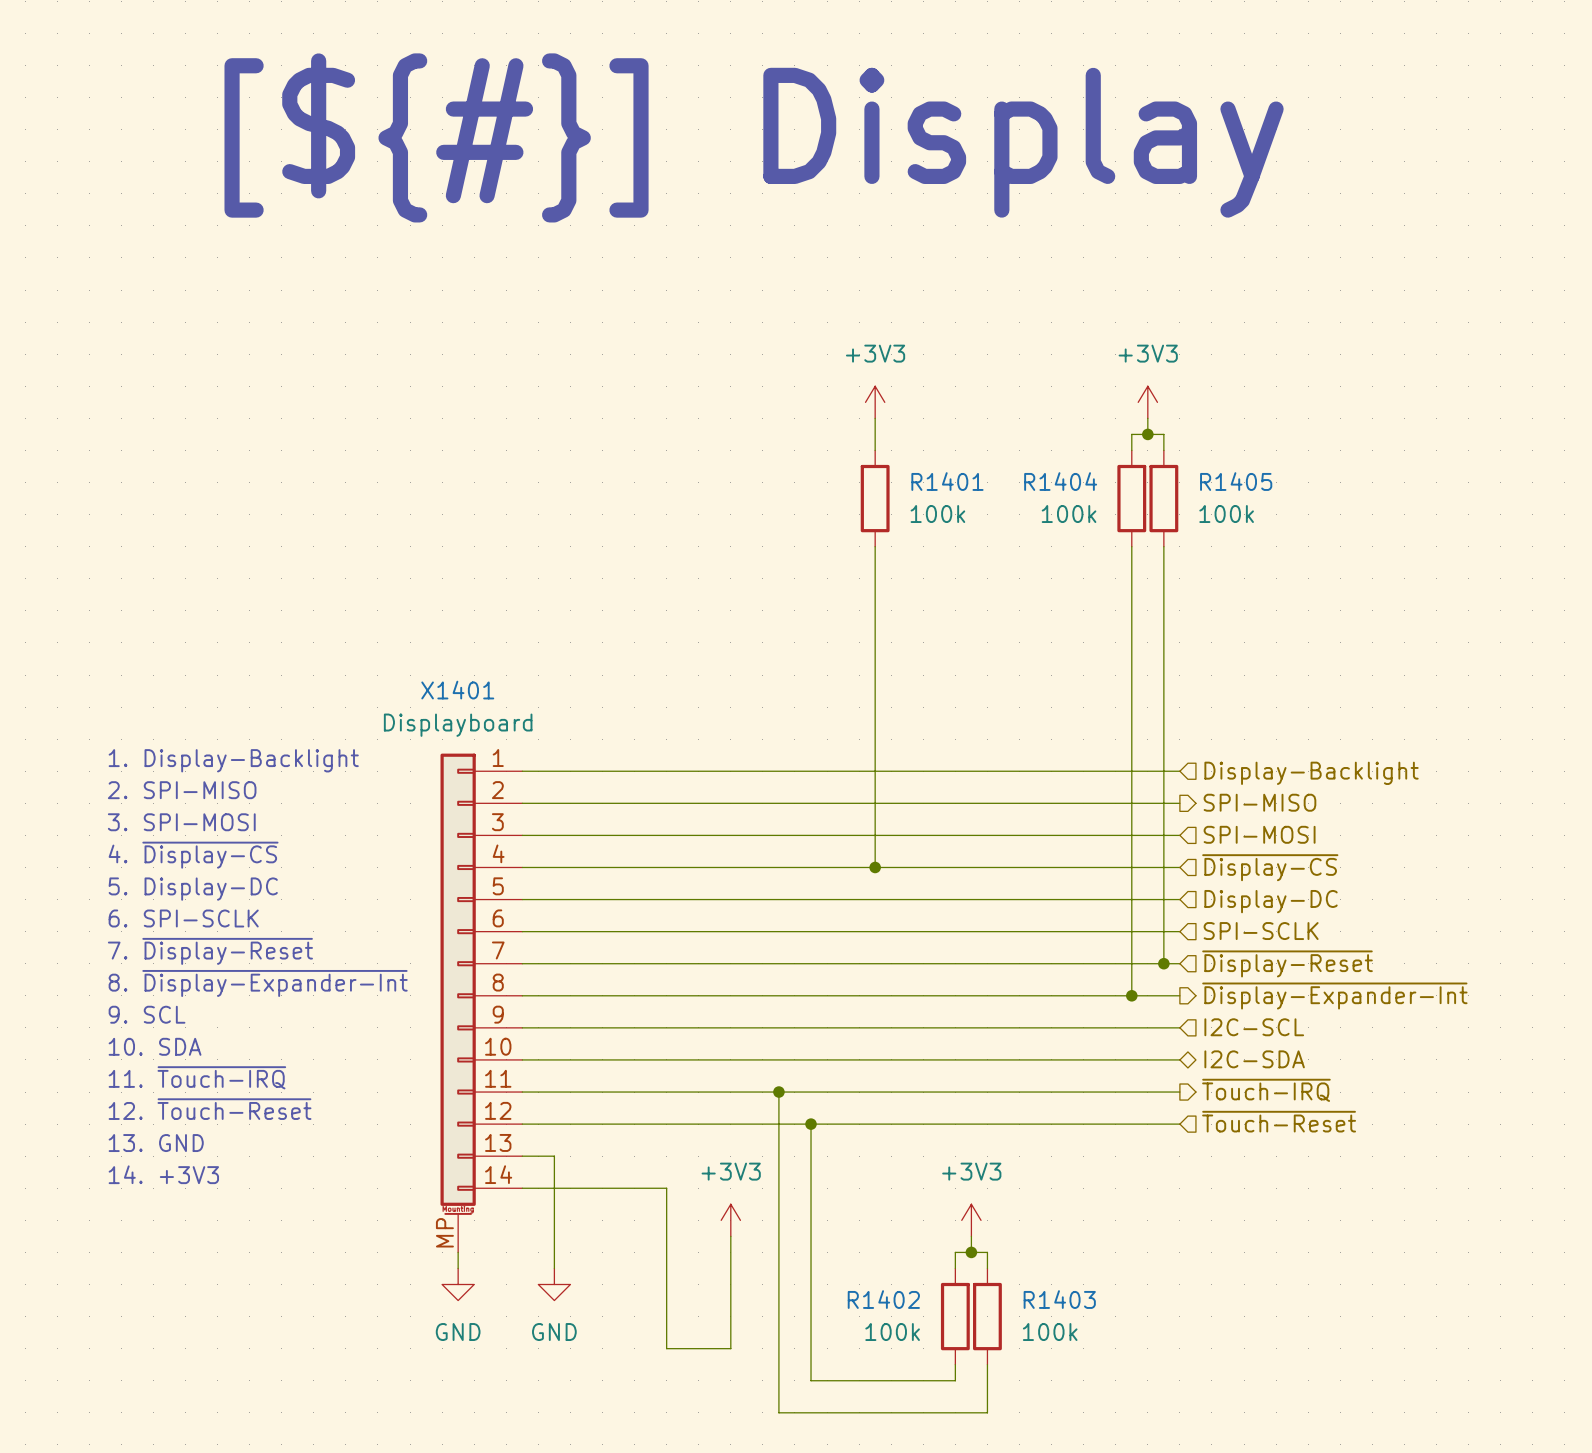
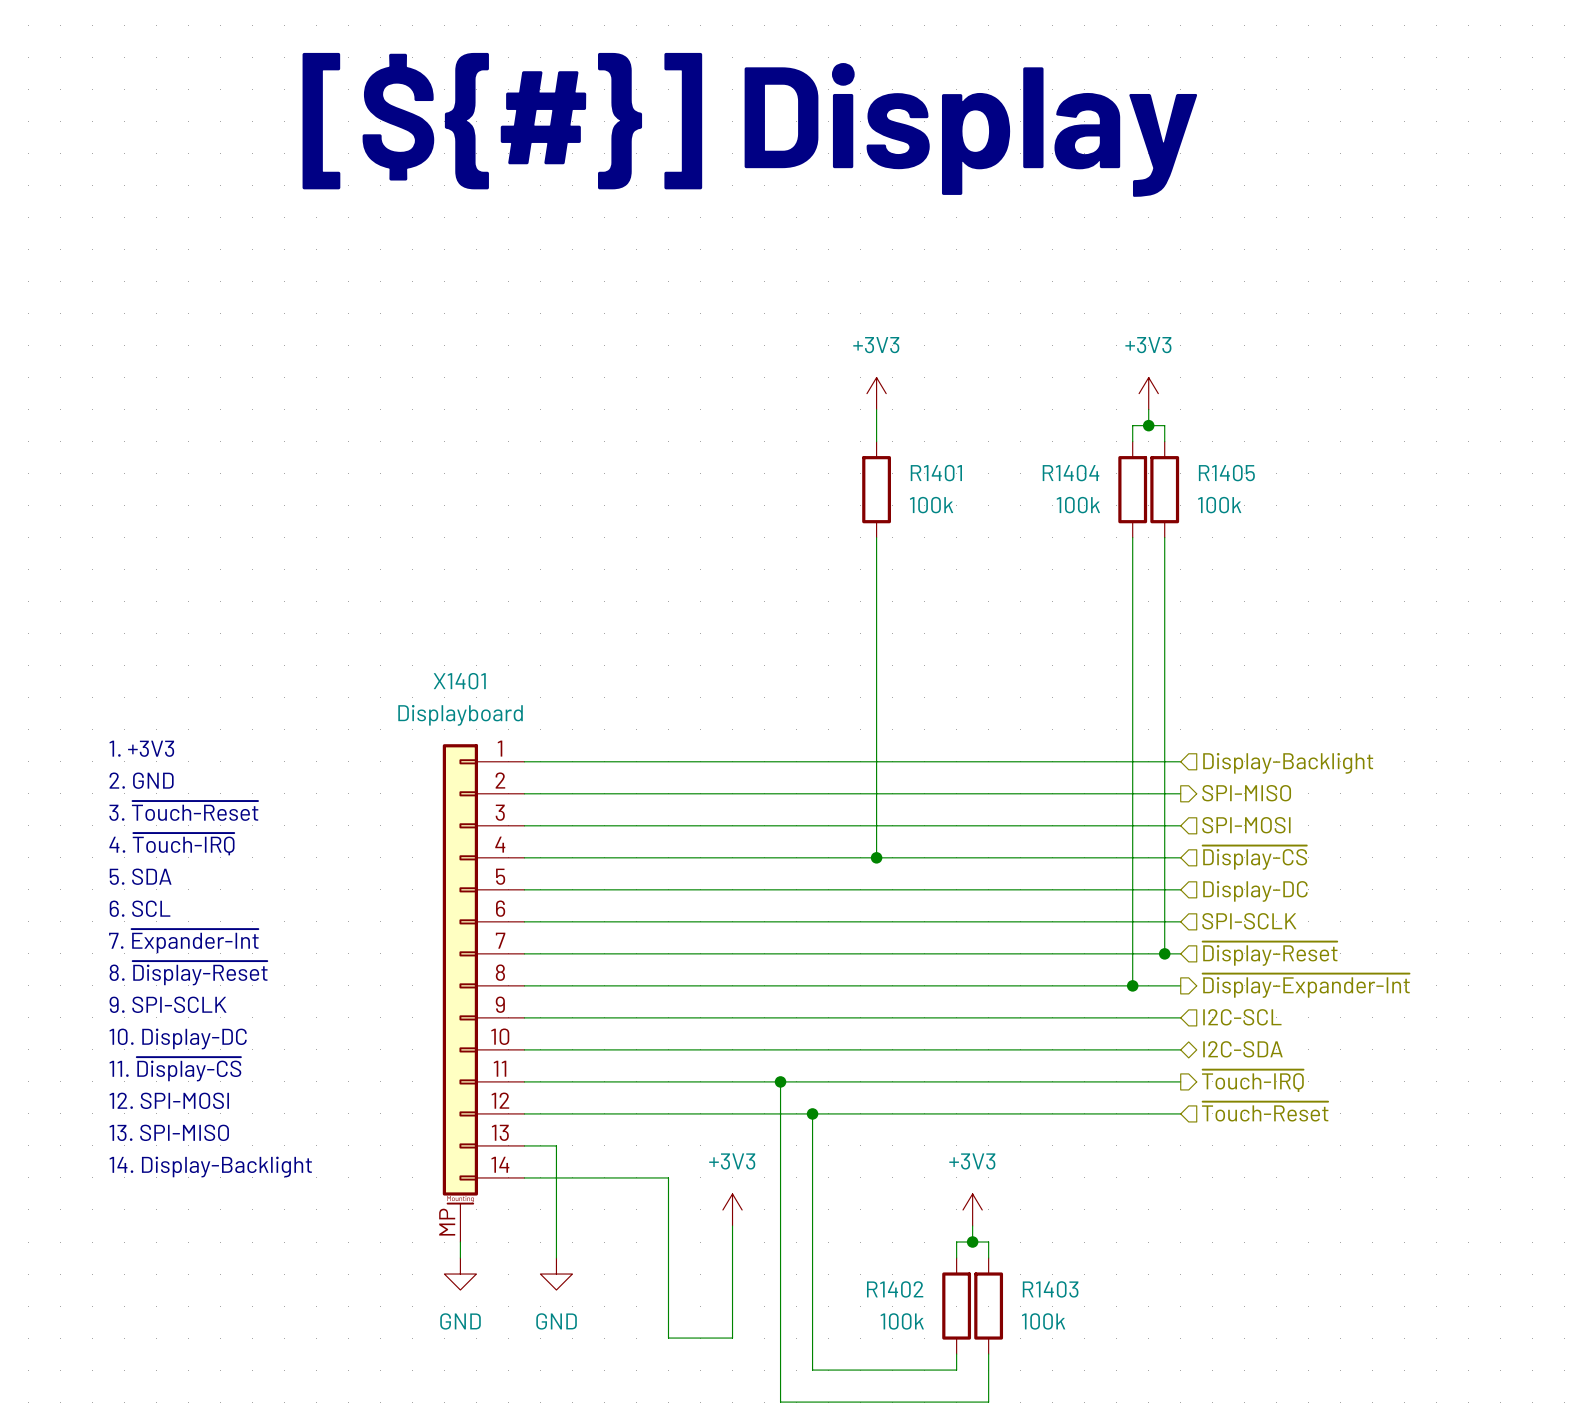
text: 1. Display-Backlight (233, 760) -> 1. +3V3 (141, 748)
text: 2. SPI-MISO (182, 790) -> 2. GND (141, 780)
text: 3. SPI-MOSI (181, 822) -> 3. ~{Touch-Reset} (183, 810)
text: 4. ~{Display-CS} (193, 855) -> 4. ~{Touch-IRQ} (171, 844)
text: 5. Display-DC (193, 889) -> 5. SDA (140, 876)
text: 6. SPI-SCLK (183, 918) -> 6. SCL (140, 908)
text: 7. ~{Display-Reset} (210, 951) -> 7. ~{Expander-Int} (183, 941)
text: 8. ~{Display-Expander-Int} (258, 983) -> 8. ~{Display-Reset} (188, 973)
text: 9. SCL (147, 1014) -> 9. SPI-SCLK (168, 1004)
text: 10. SDA (155, 1046) -> 10. Display-DC (178, 1038)
text: 11. ~{Touch-IRQ} (197, 1077) -> 11. ~{Display-CS} (175, 1069)
text: 12. ~{Touch-Reset} (210, 1109) -> 12. SPI-MOSI (169, 1100)
text: 13. GND (156, 1143) -> 13. SPI-MISO (169, 1132)
text: 14. +3V3 (163, 1174) -> 14. Display-Backlight (210, 1167)

